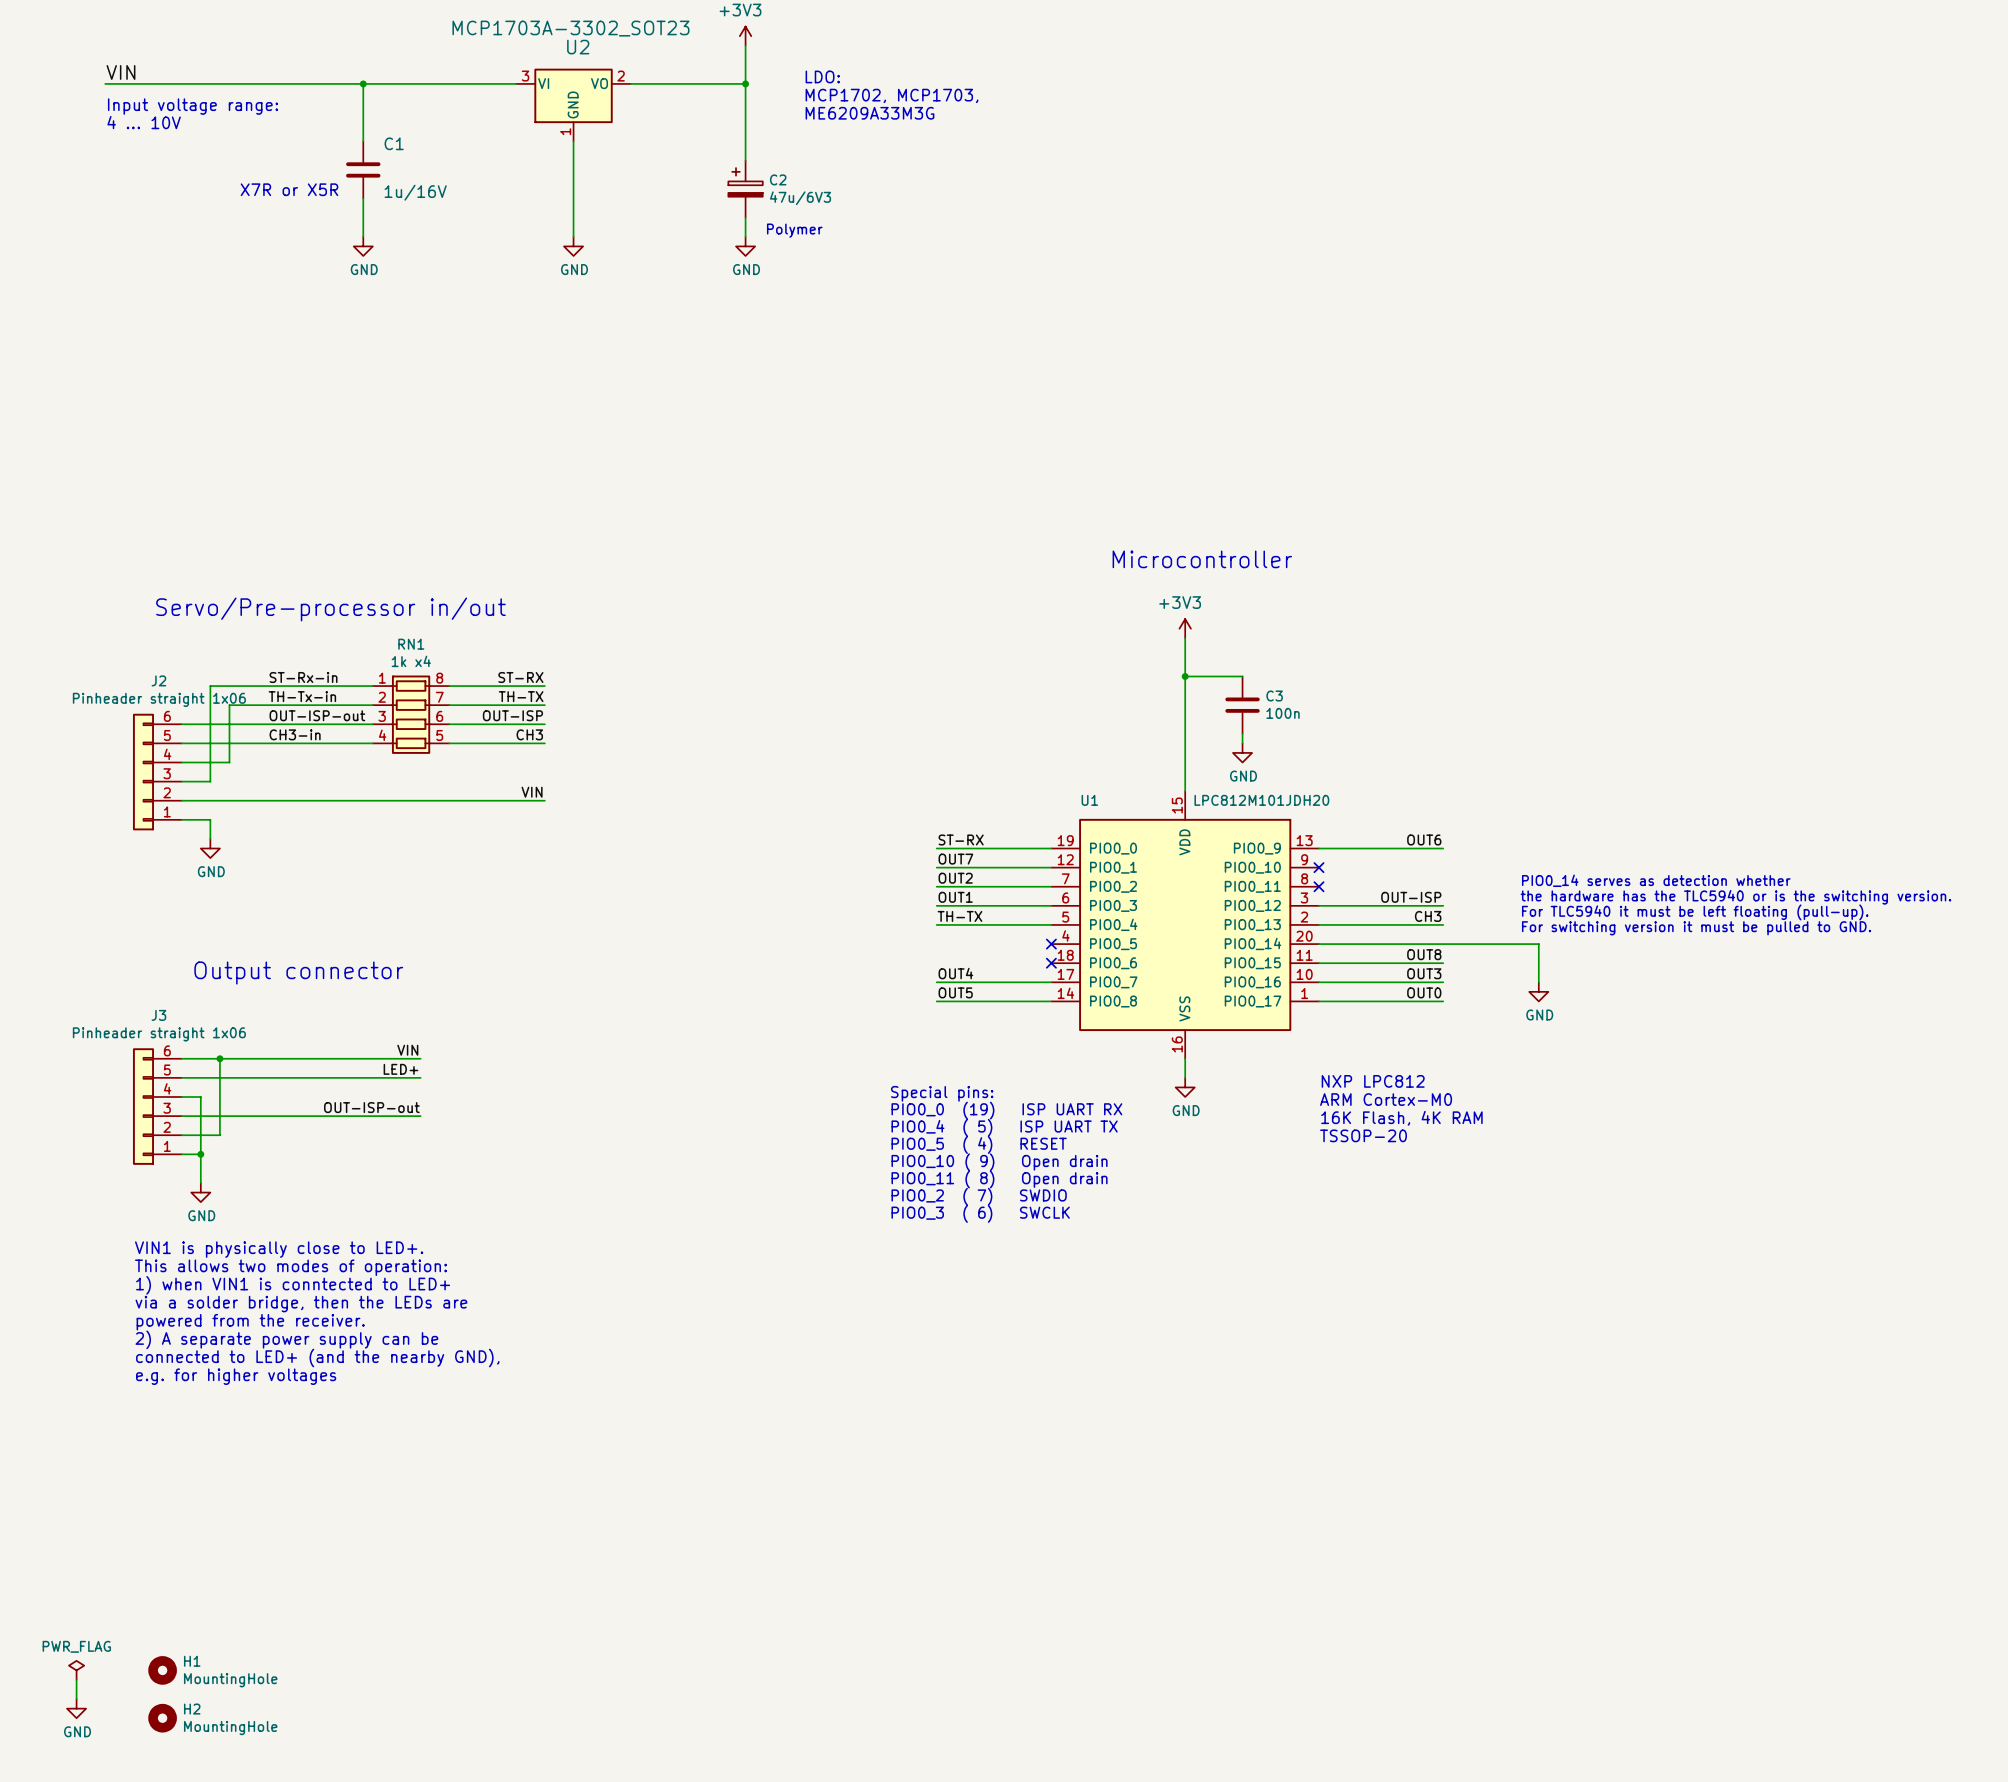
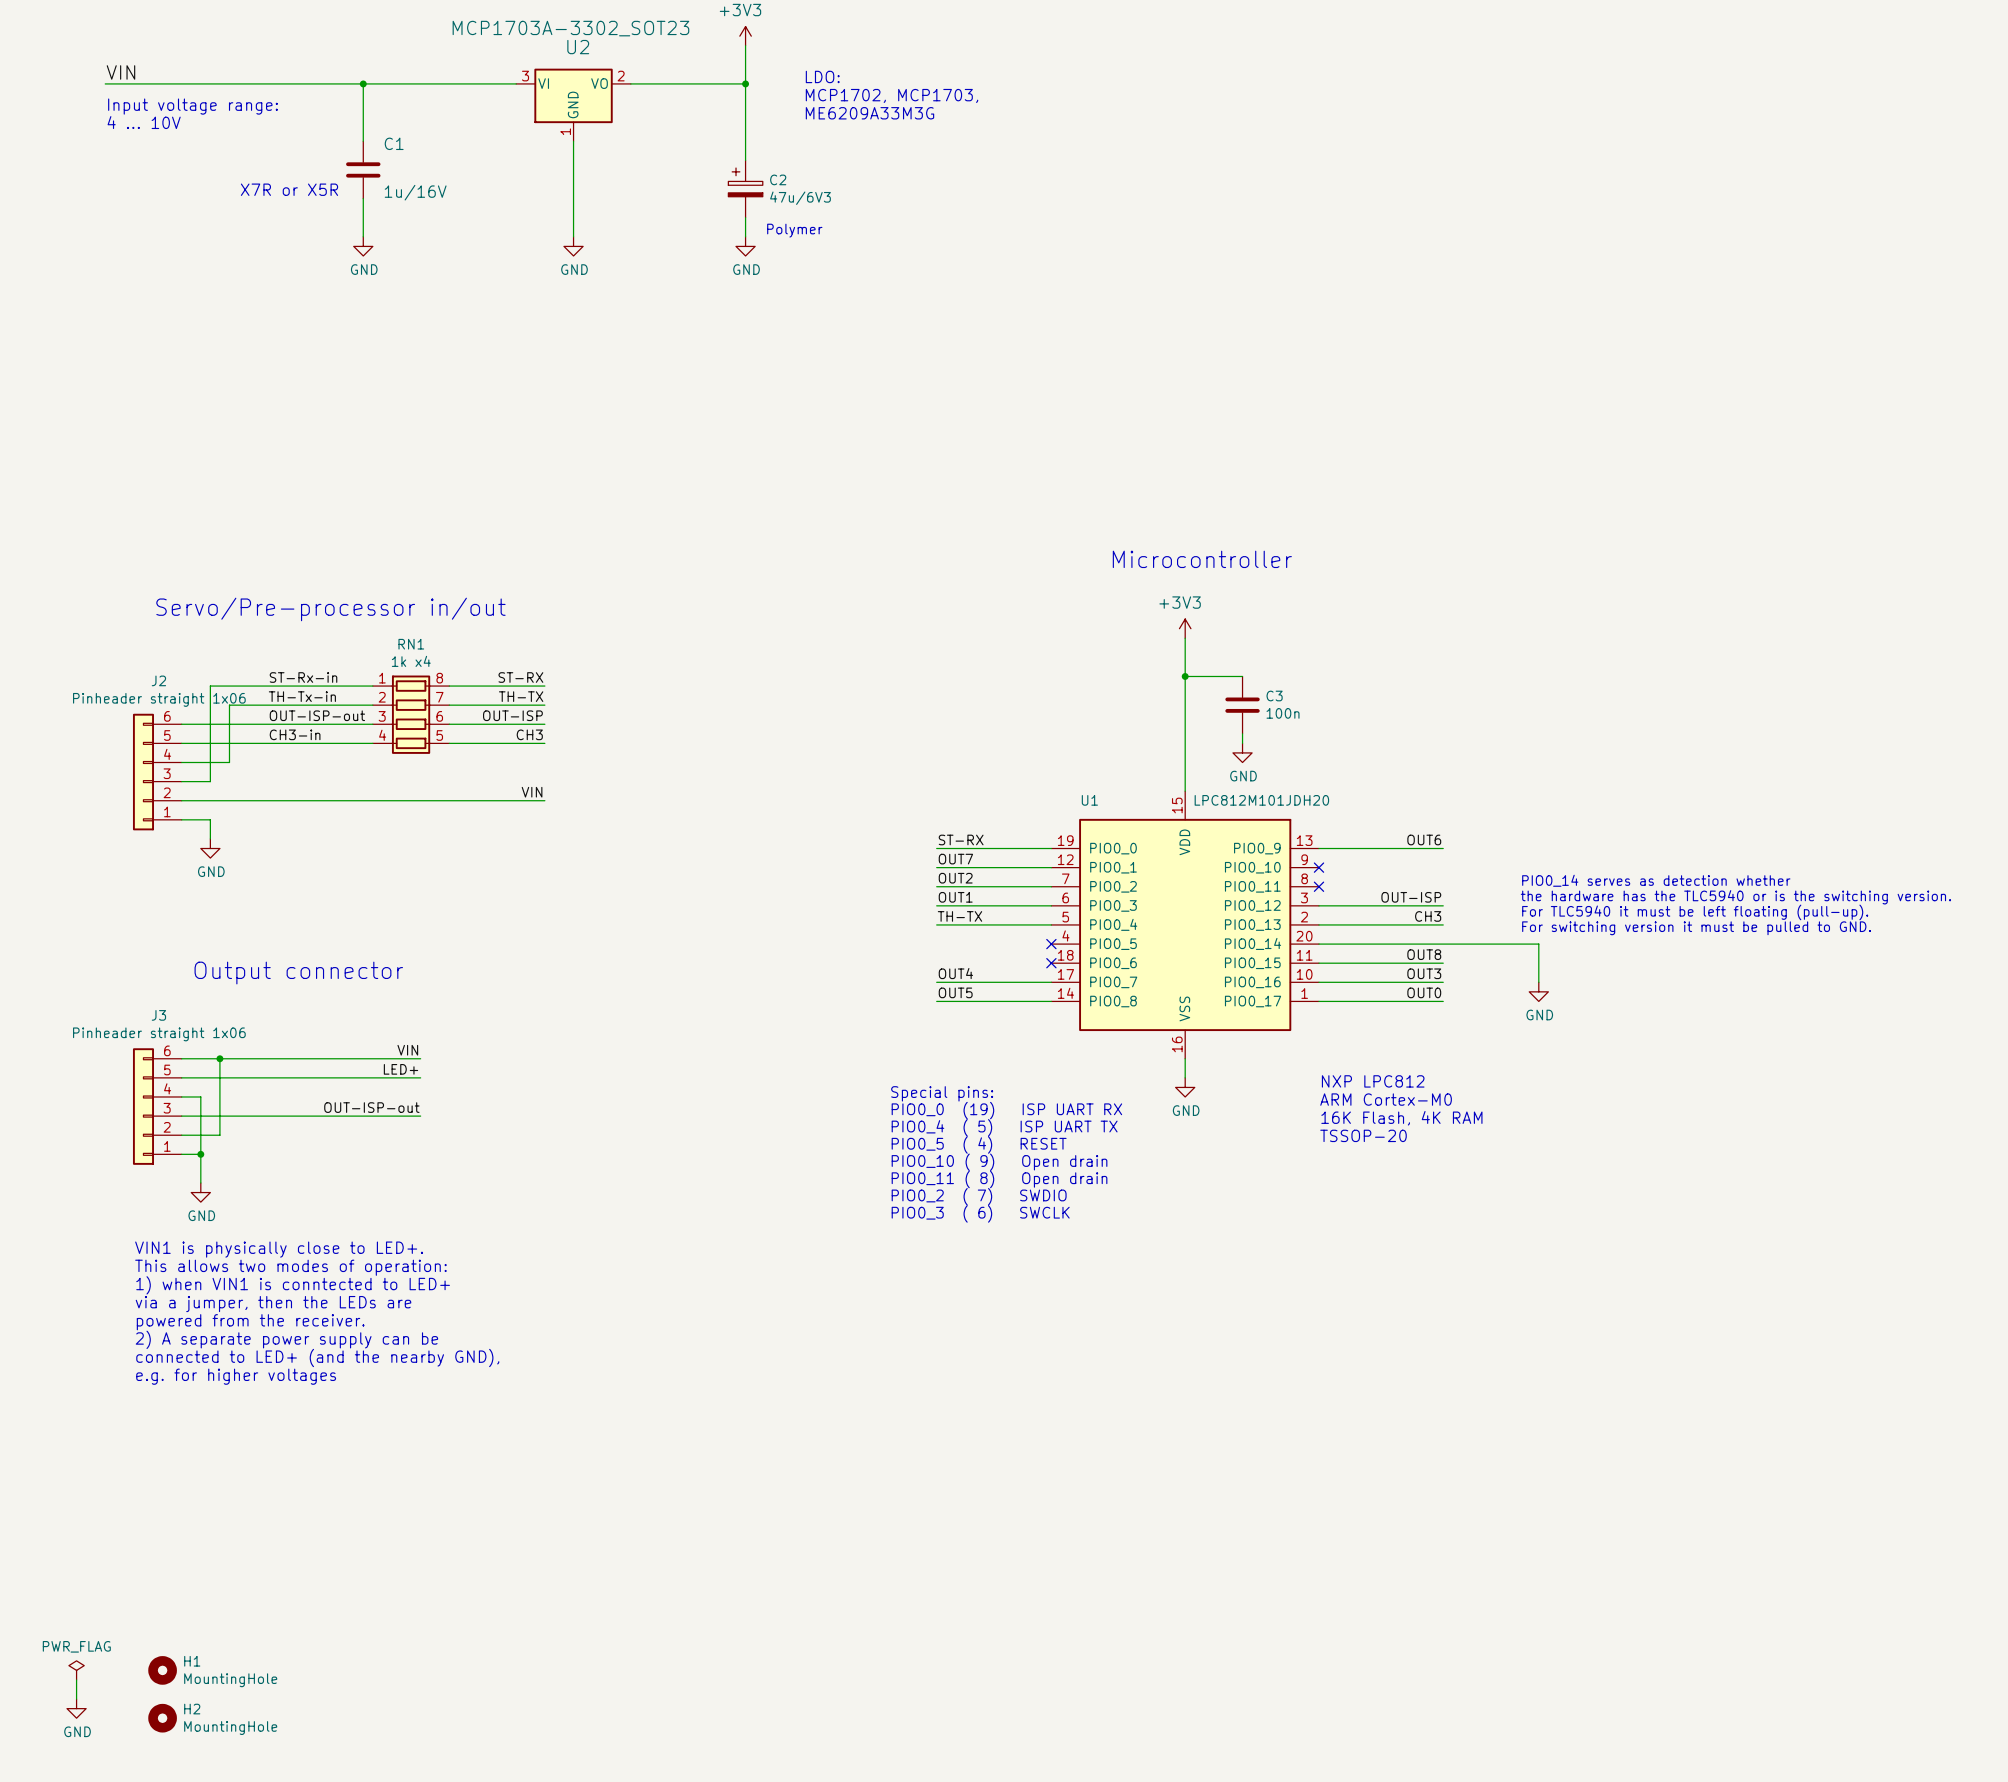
text: via a solder bridge, then the LEDs are (301, 1304) -> via a jumper, then the LEDs are (273, 1304)

